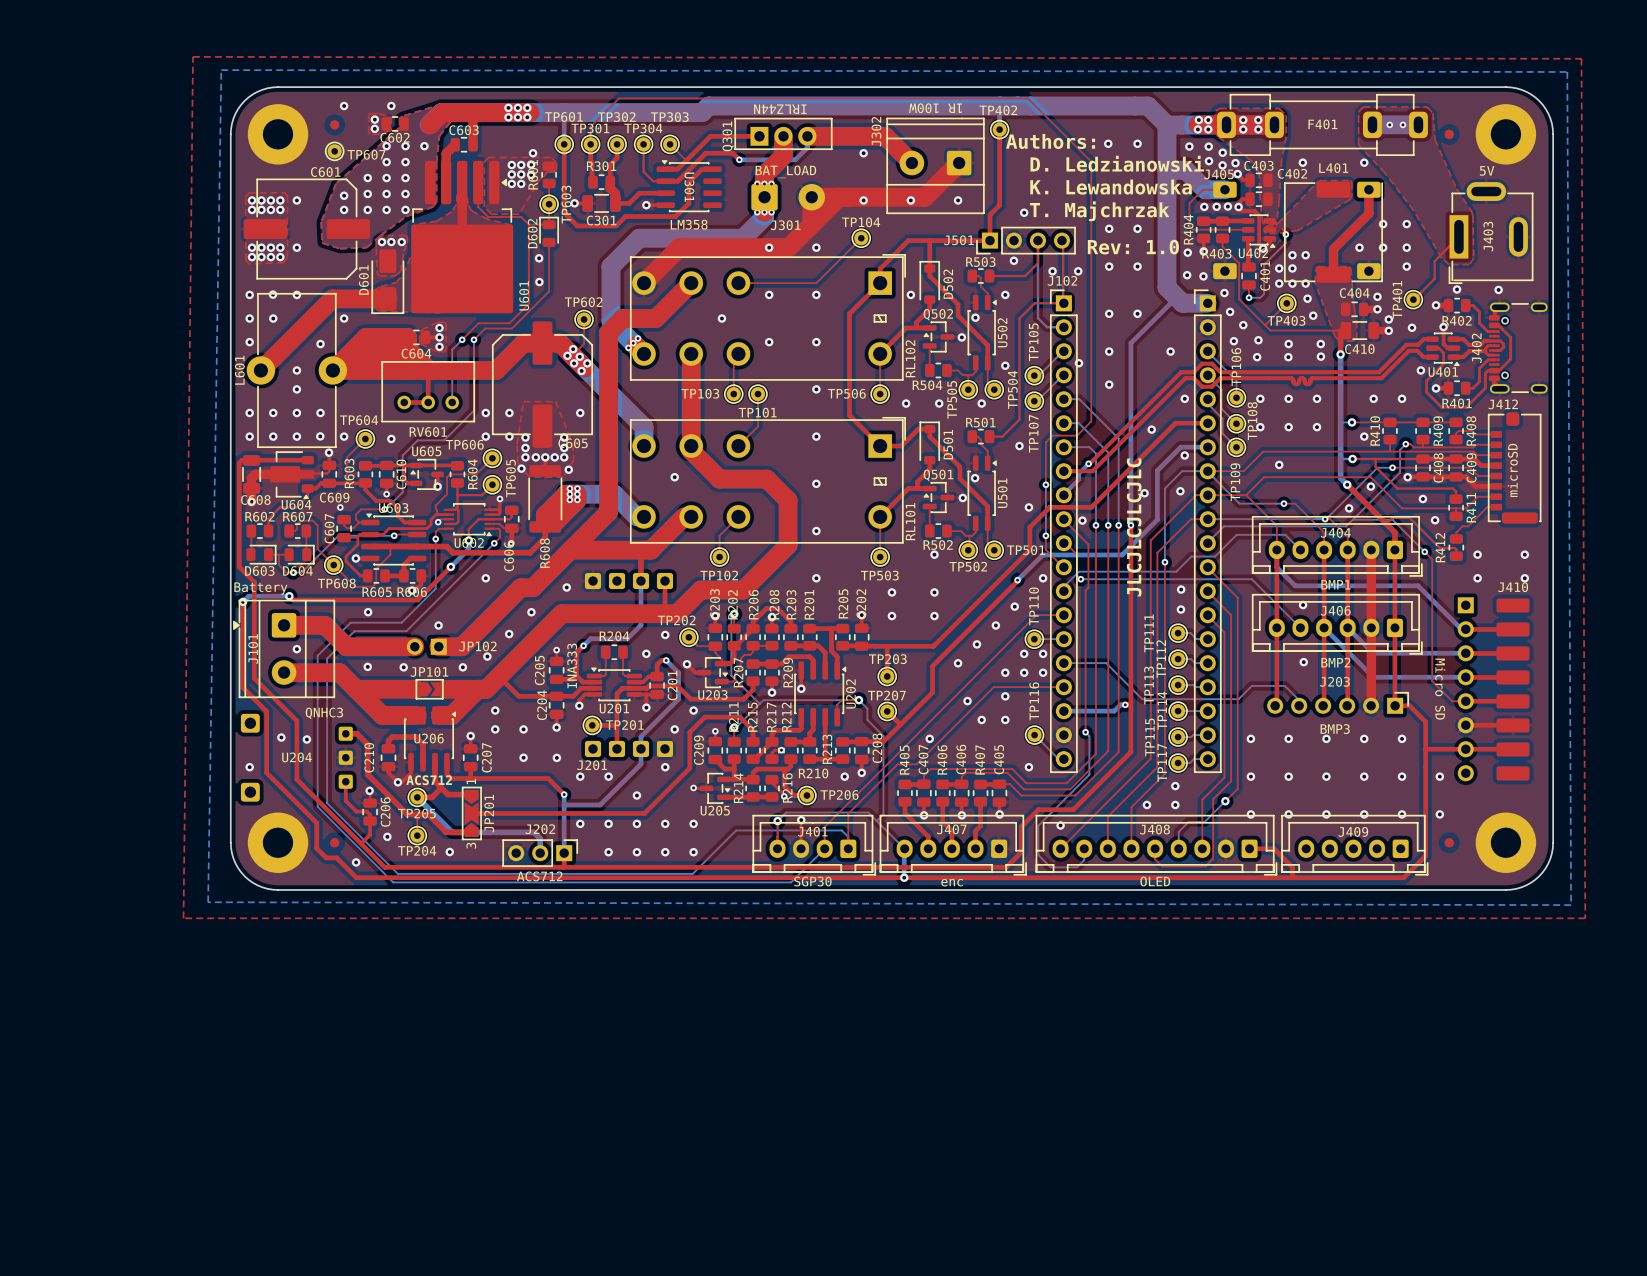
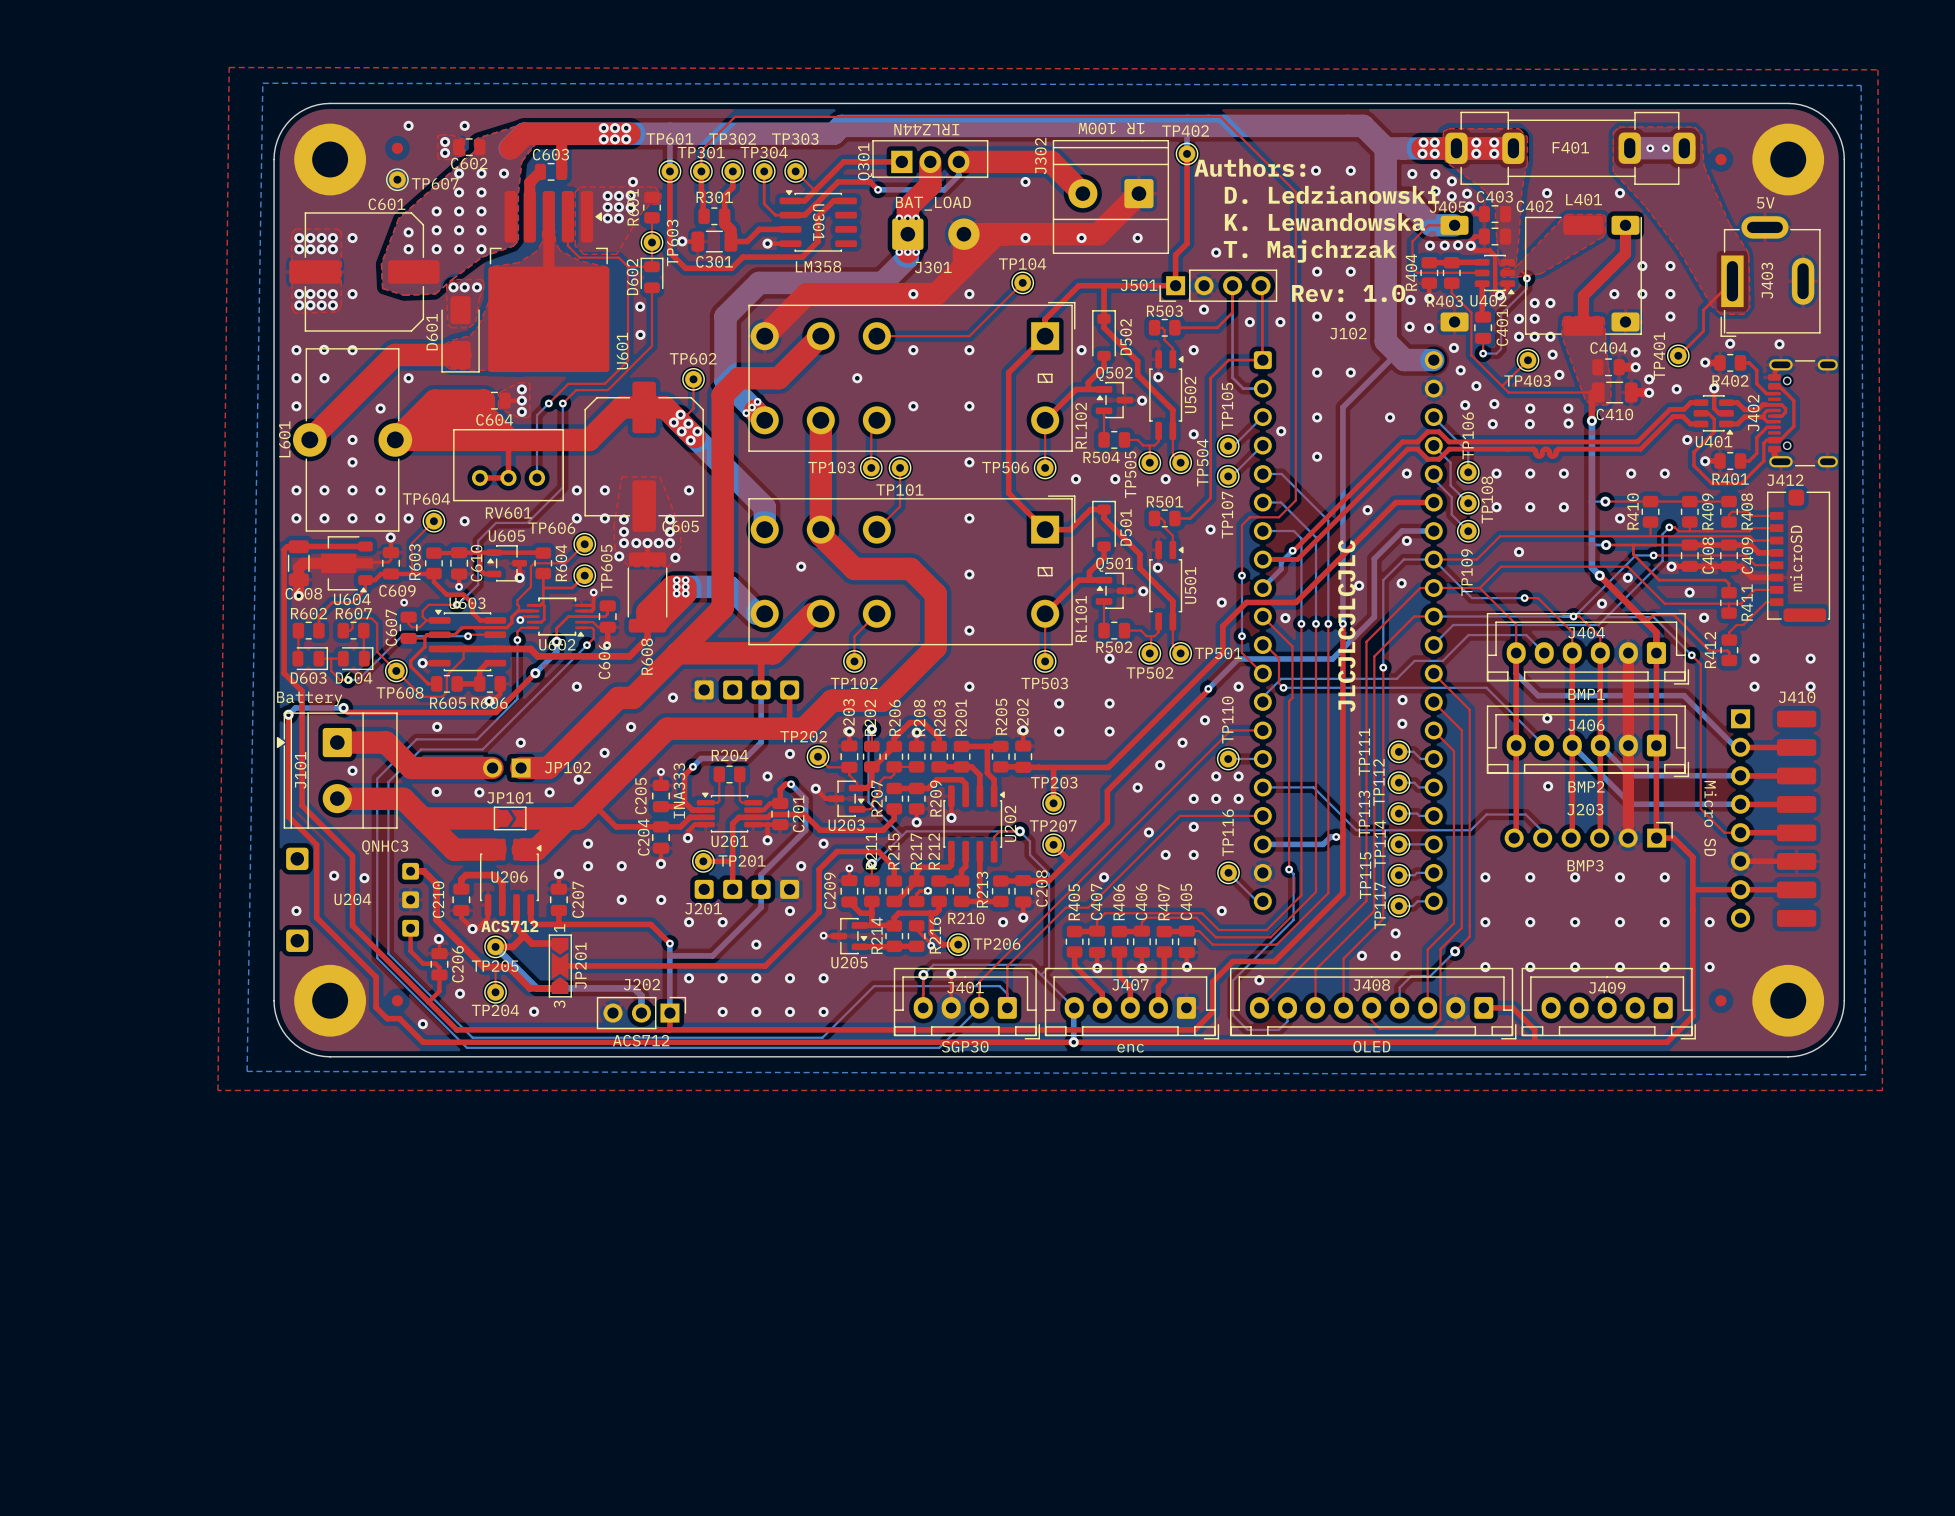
J102 name position: J102 (1062, 280) -> J102 (1348, 333)
J102 footprint: [1050, 289, 1222, 773] -> [1253, 351, 1443, 911]

